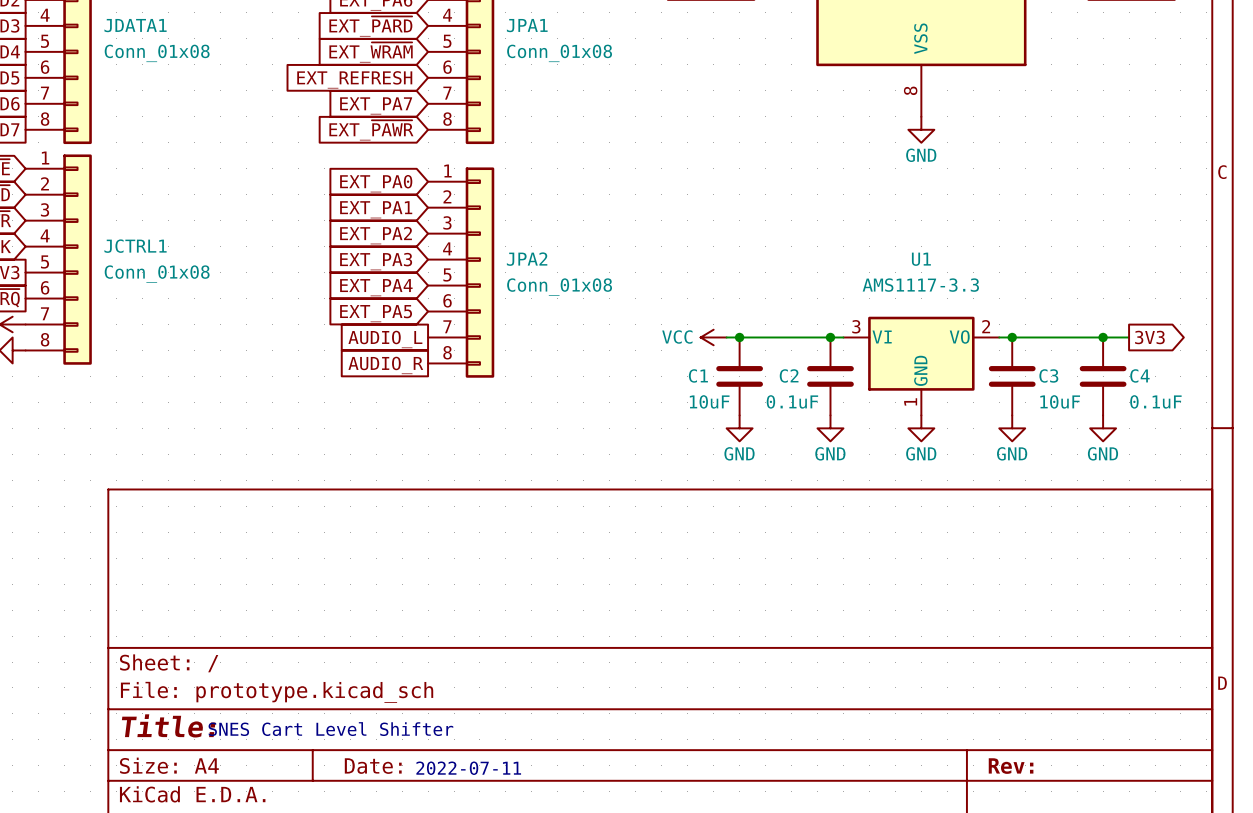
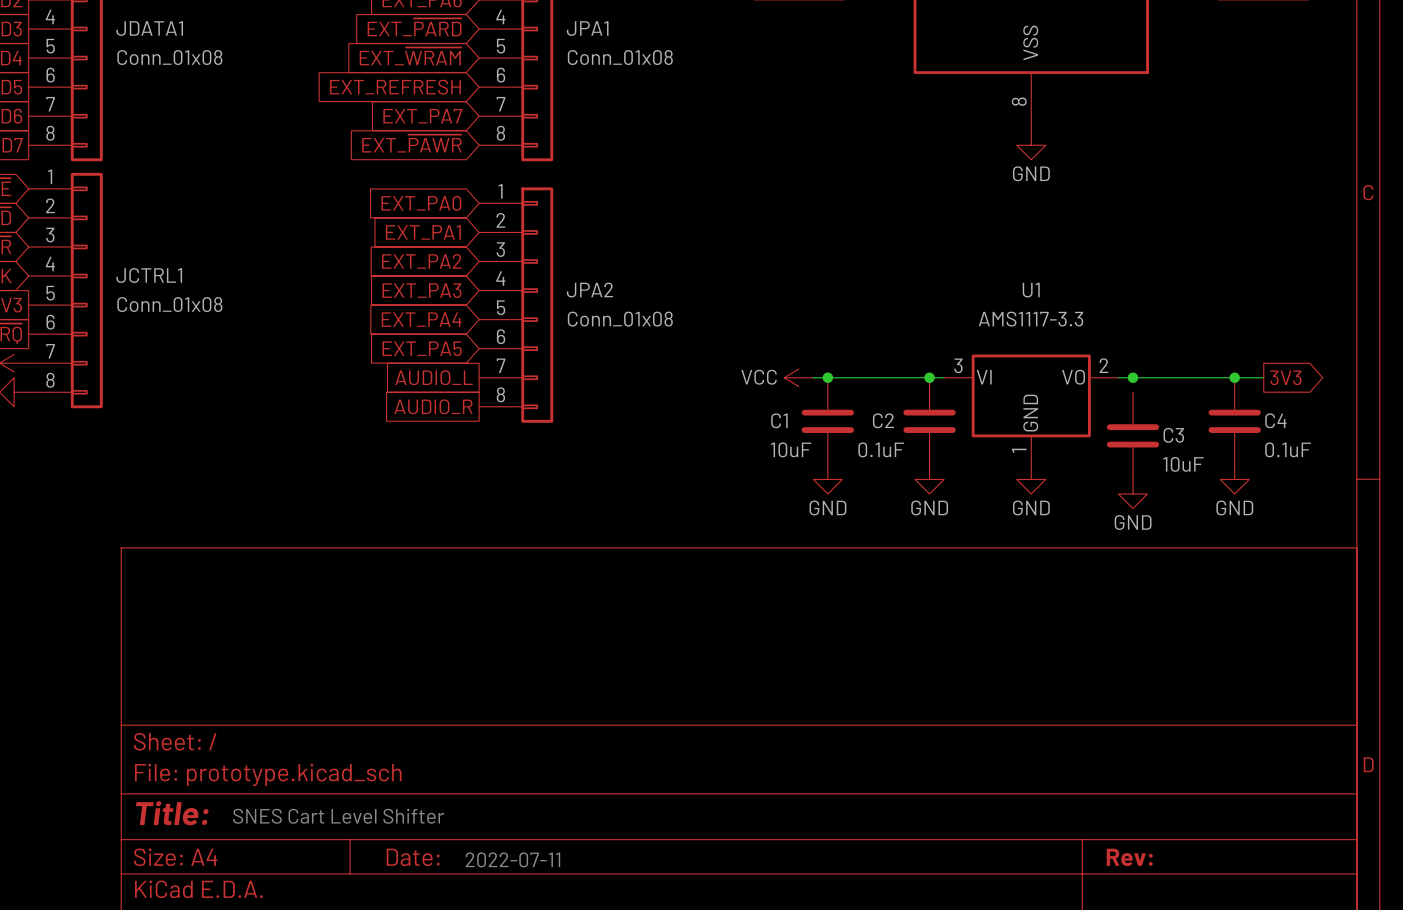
C3 position: (1012, 376) -> (1132, 435)
power symbol position: GND (1012, 428) -> GND (1132, 493)

